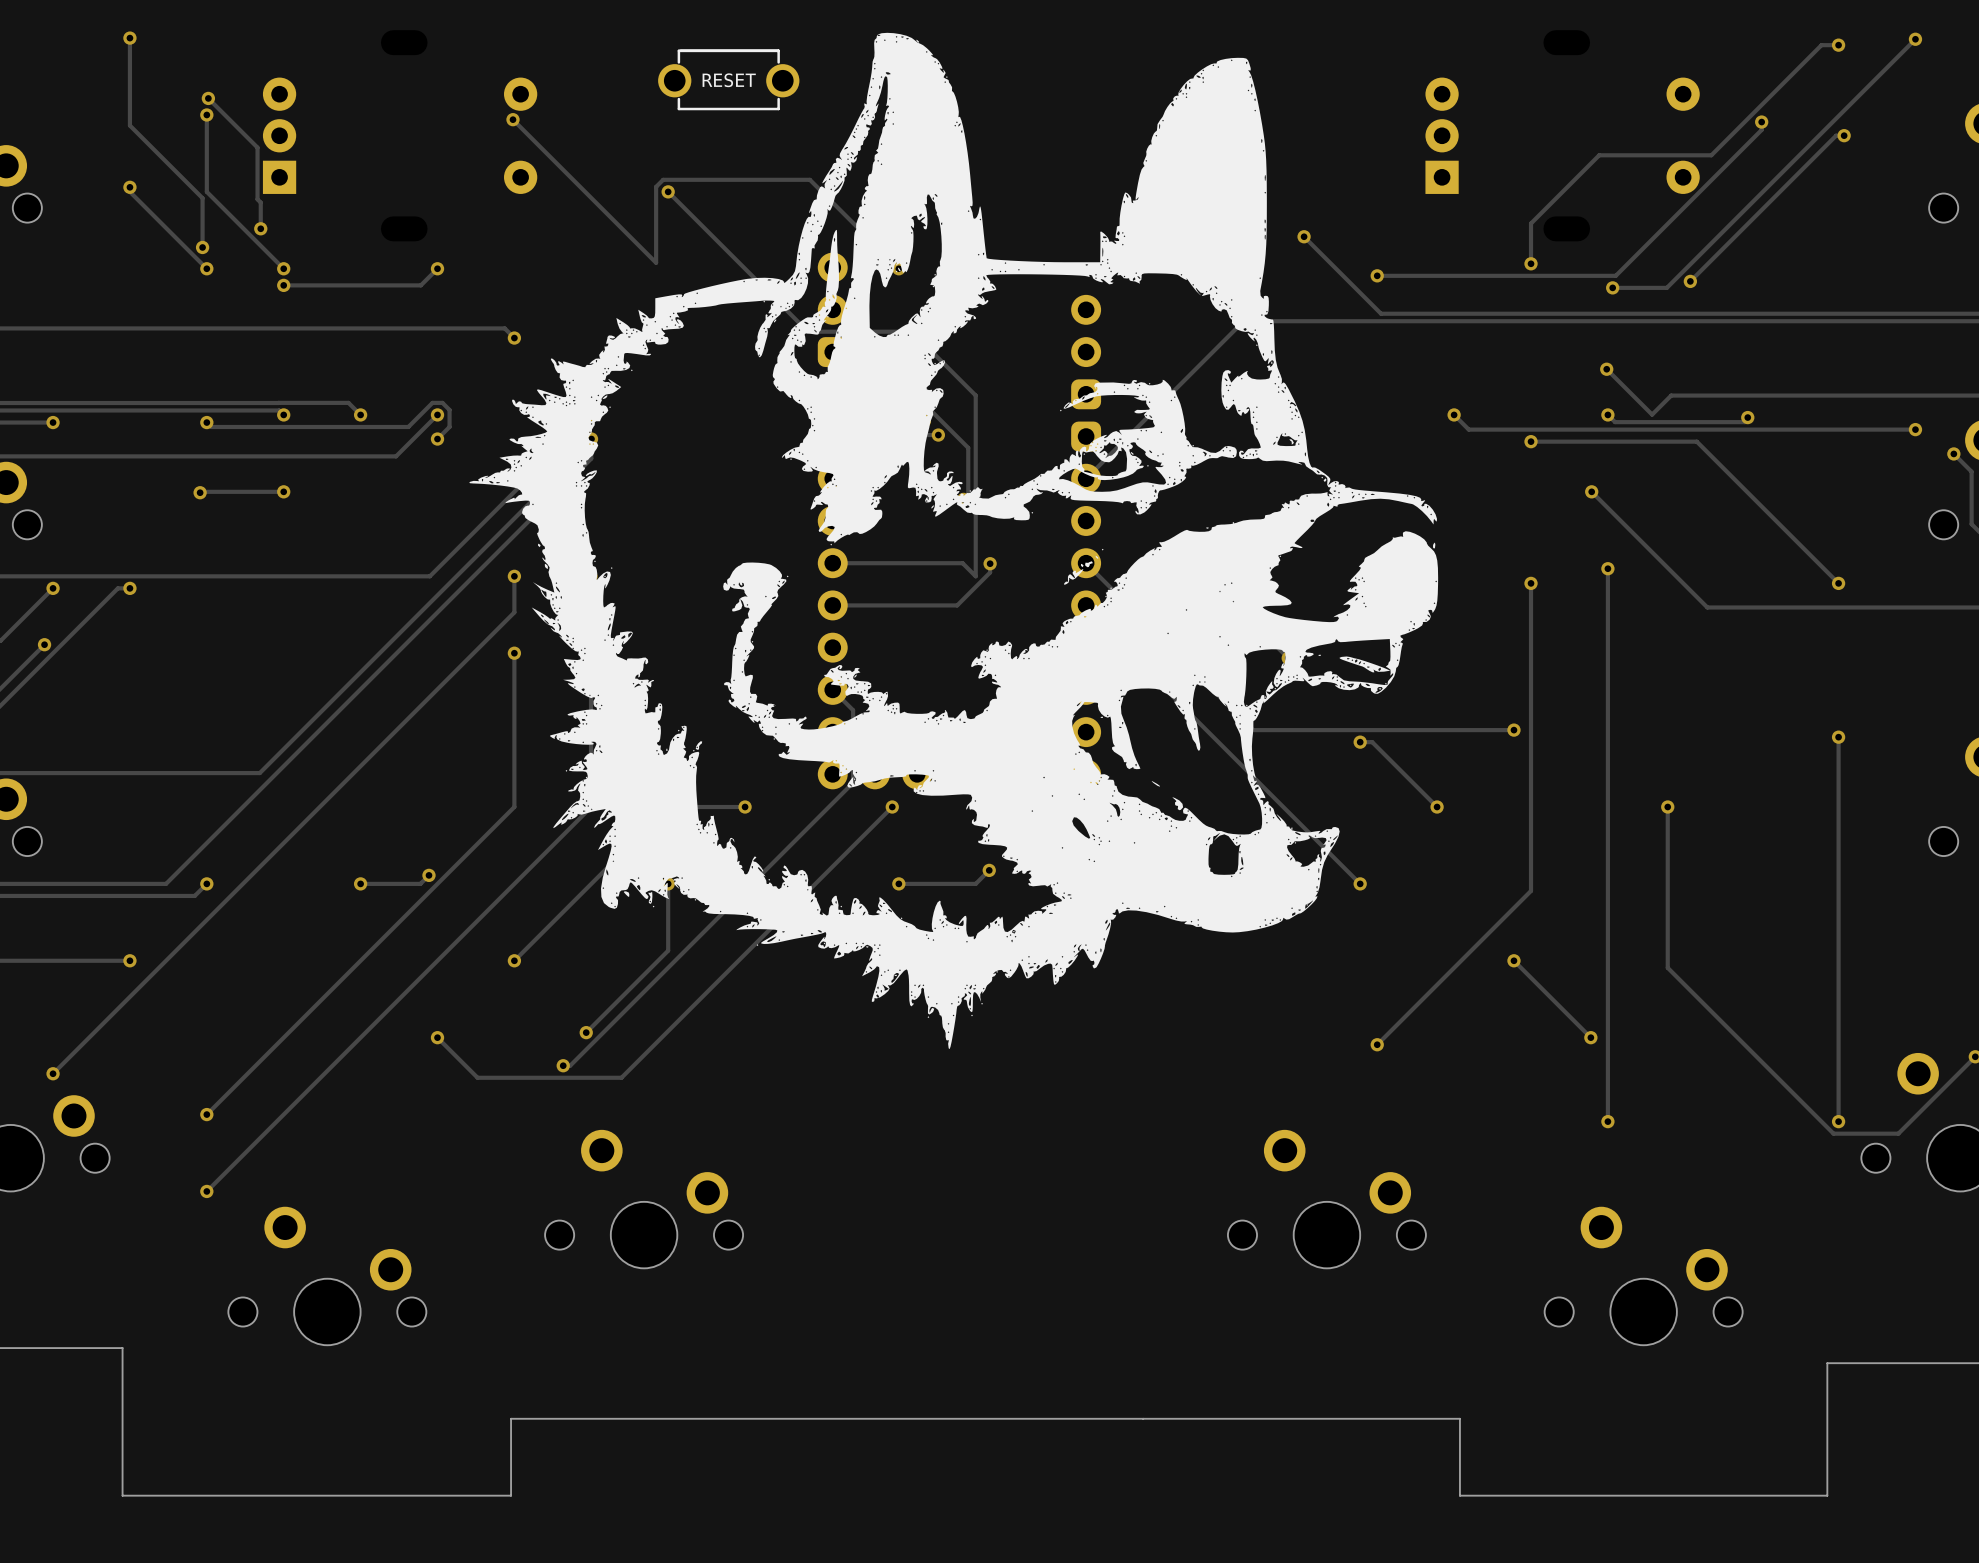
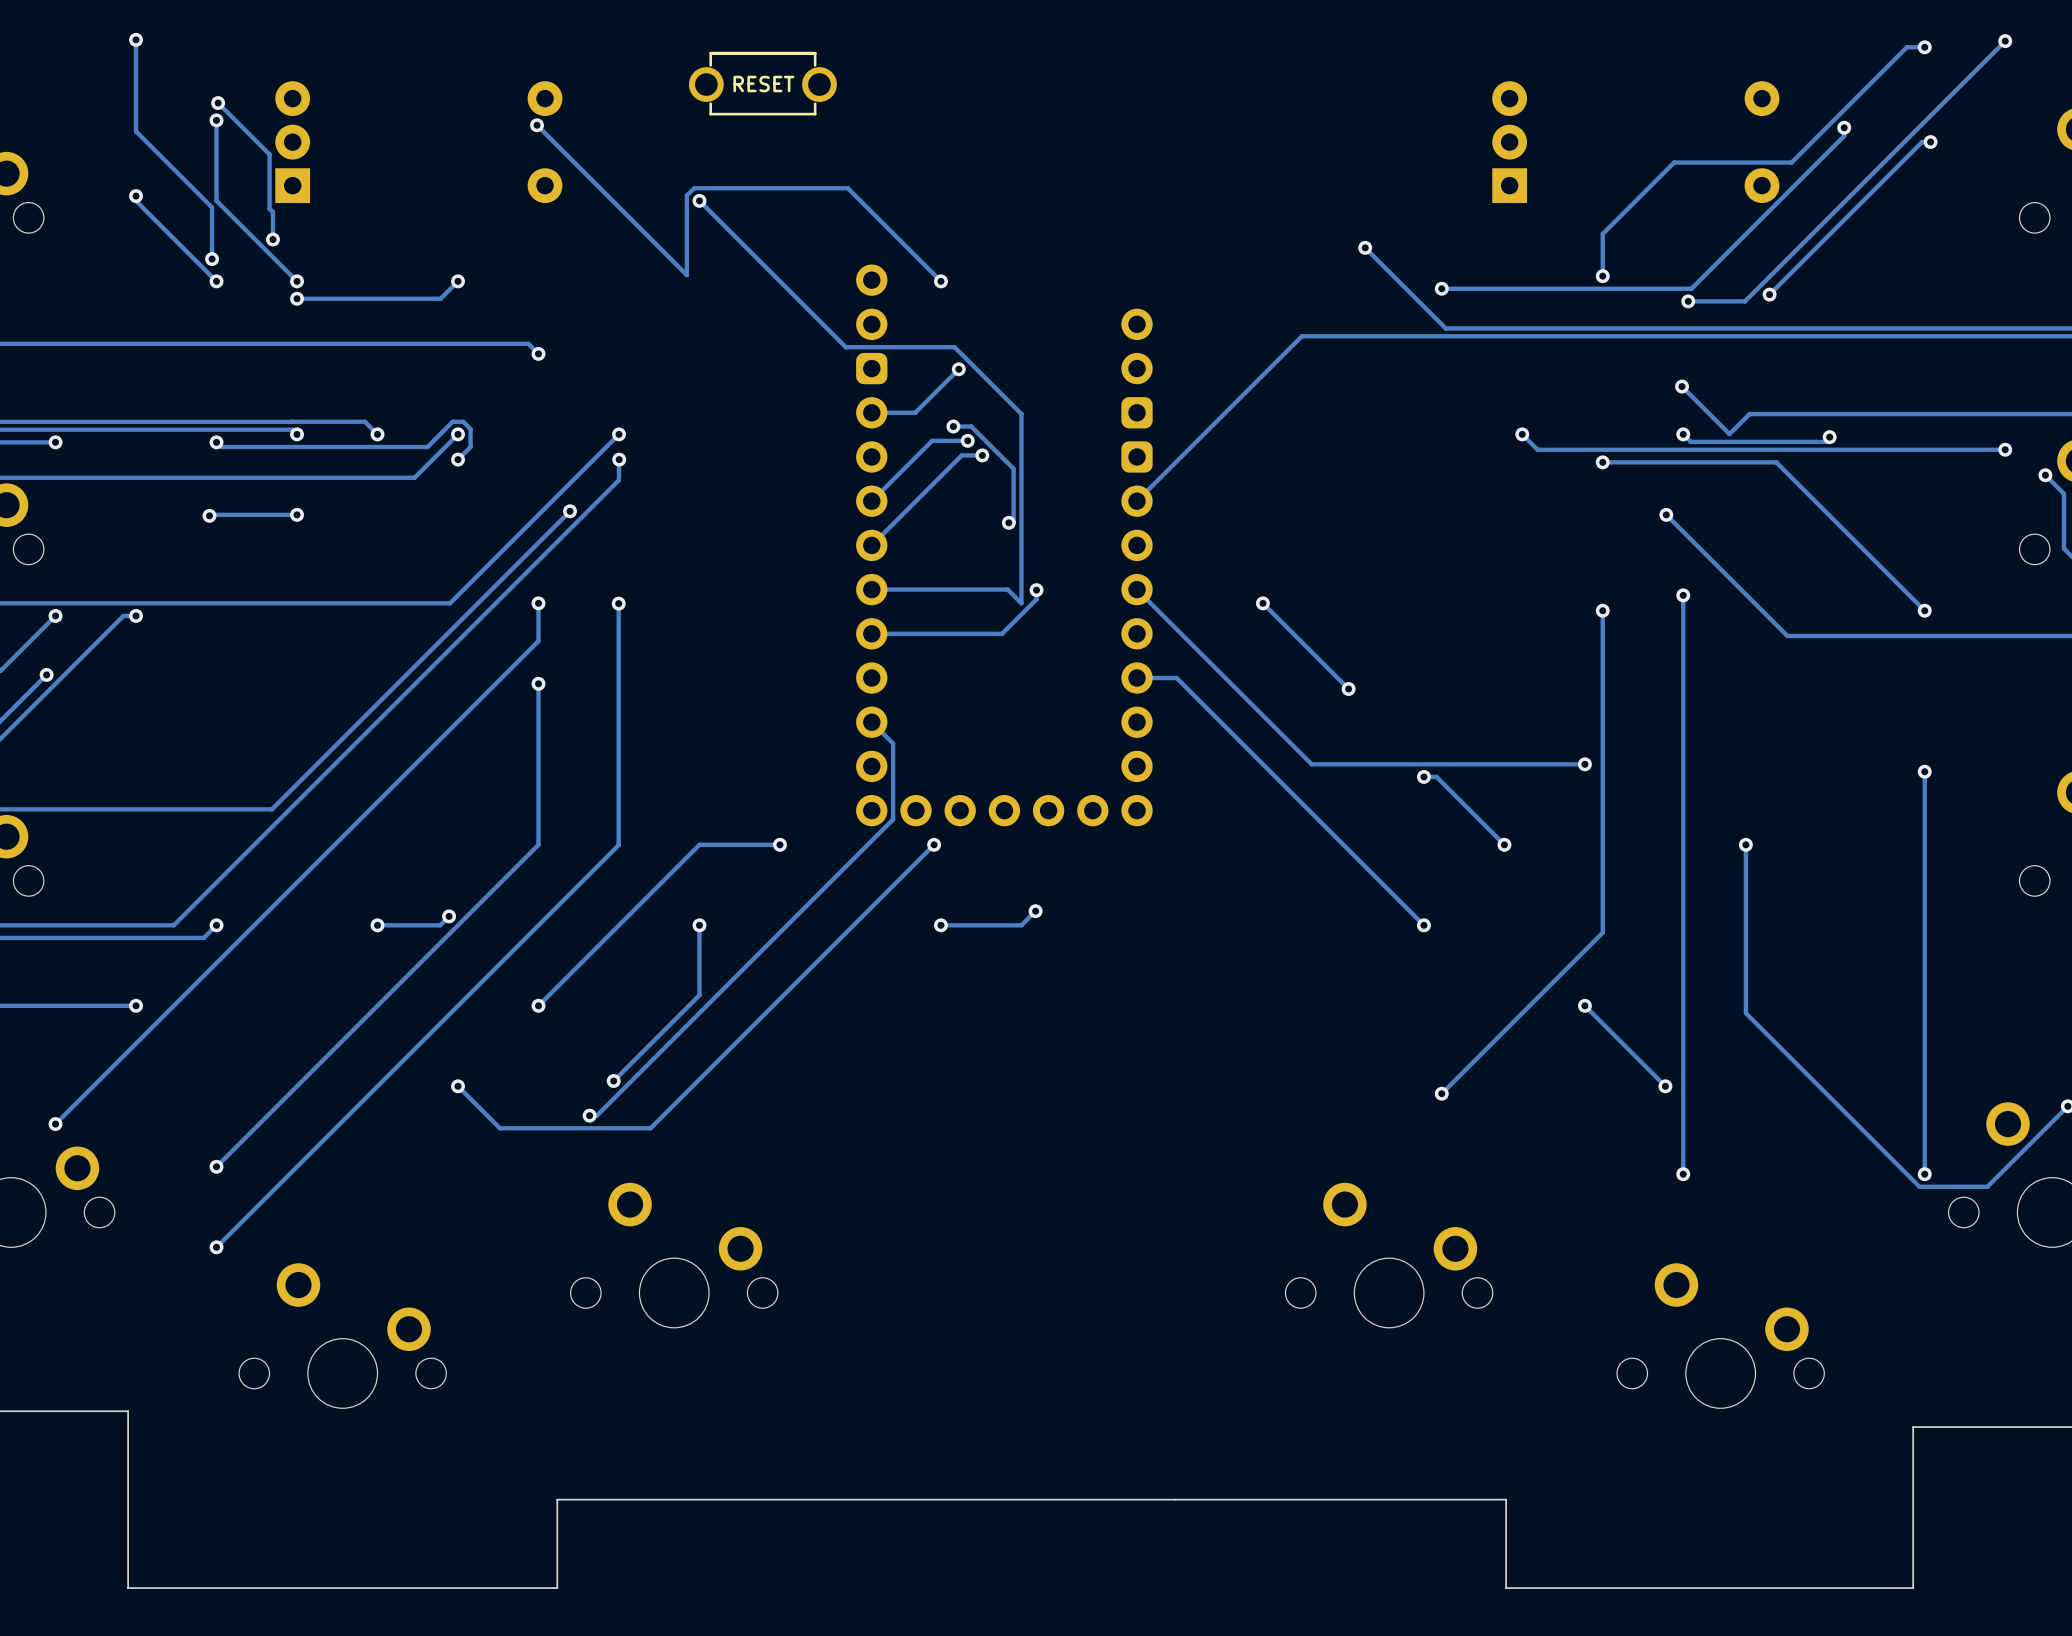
drawing: [469, 32, 1439, 1049] -> none
board edge: (122, 1348) (122, 1495) (511, 1495) (511, 1418) (1459, 1418) (1459, 1495) (1827, 1495) (1827, 1363) -> (128, 1411) (128, 1588) (557, 1588) (557, 1499) (1506, 1499) (1506, 1588) (1913, 1588) (1913, 1427)

